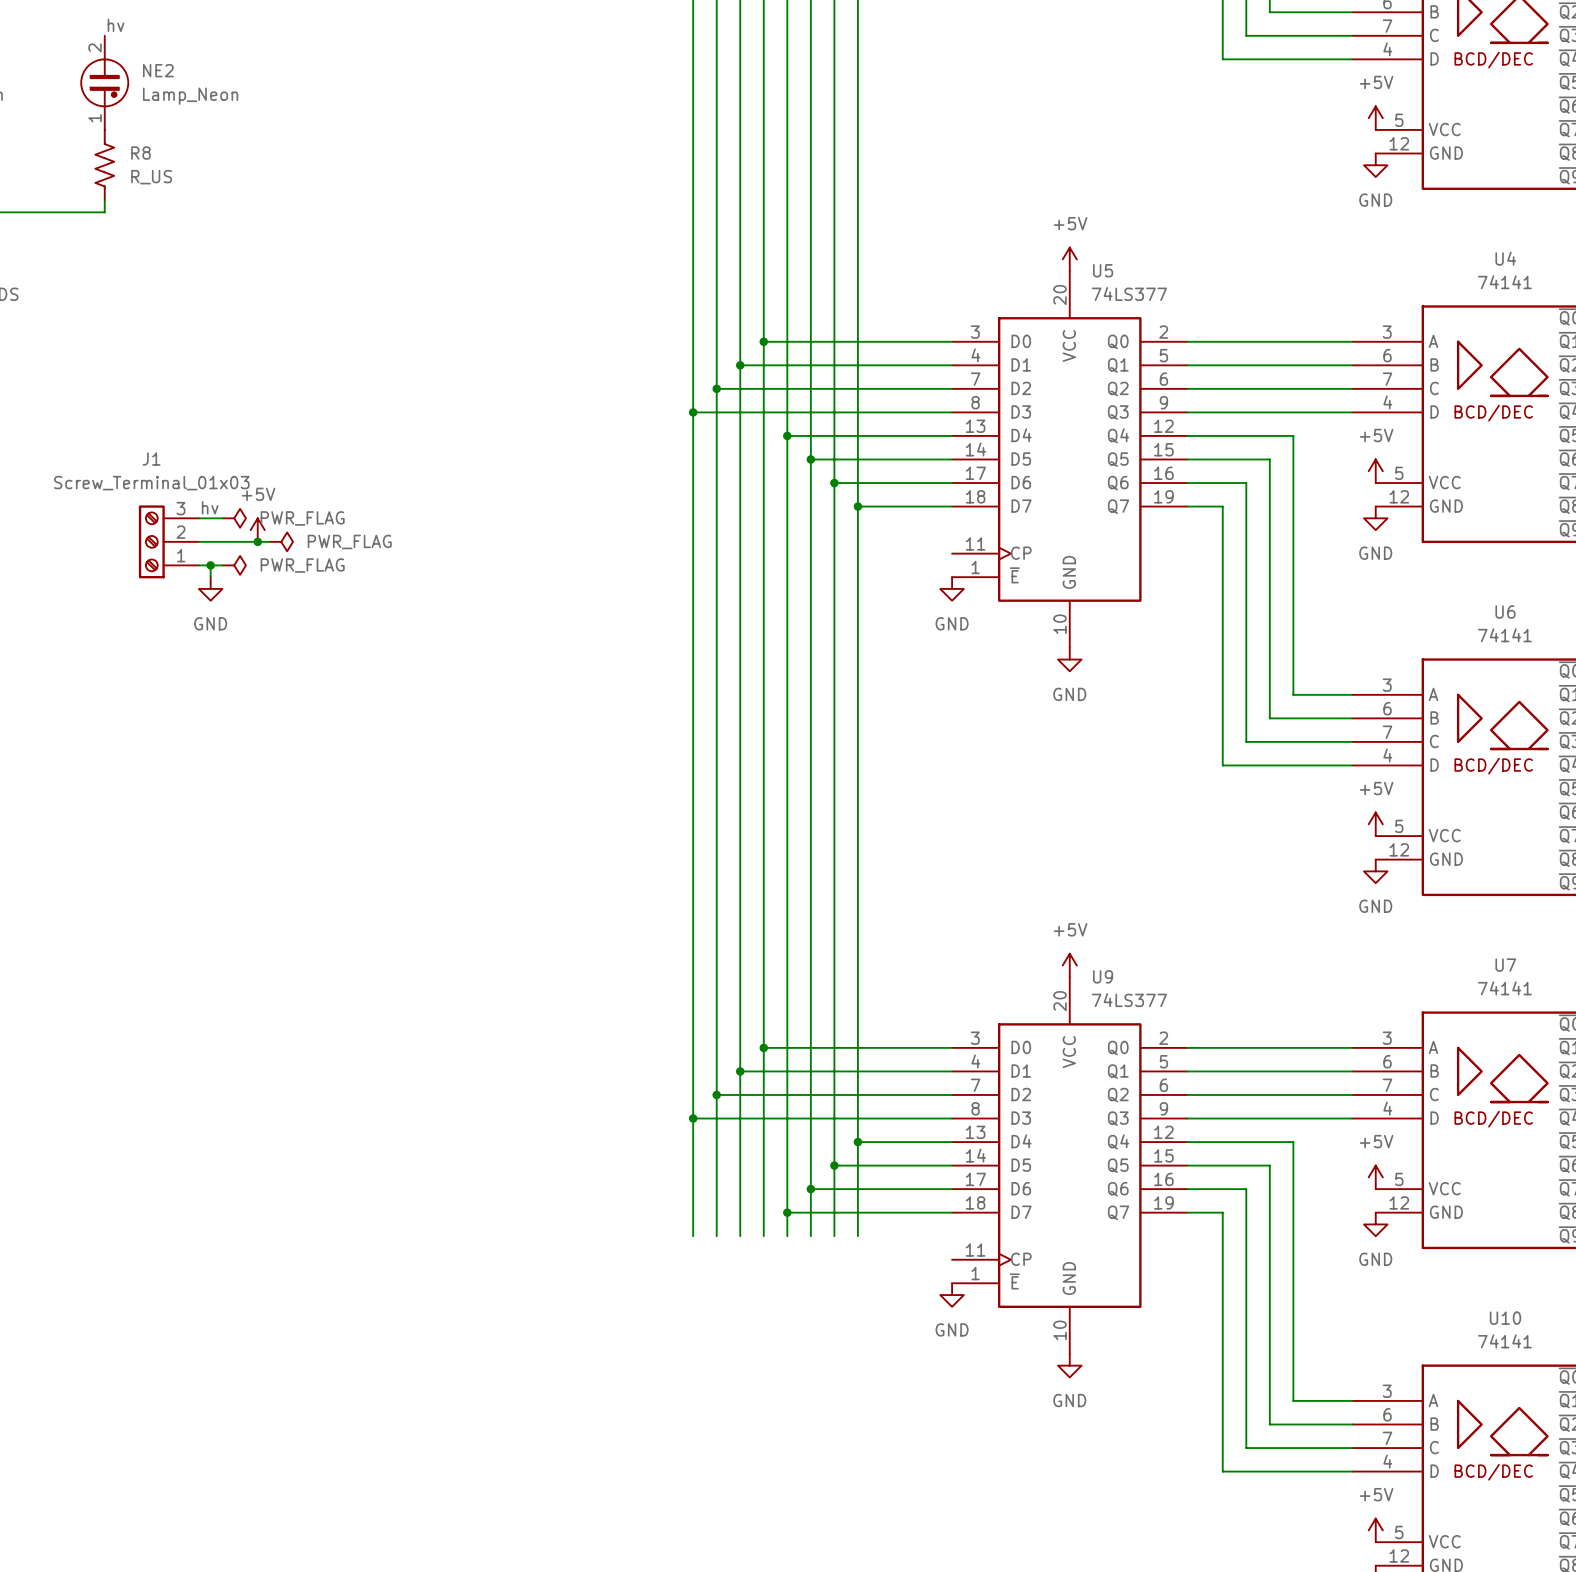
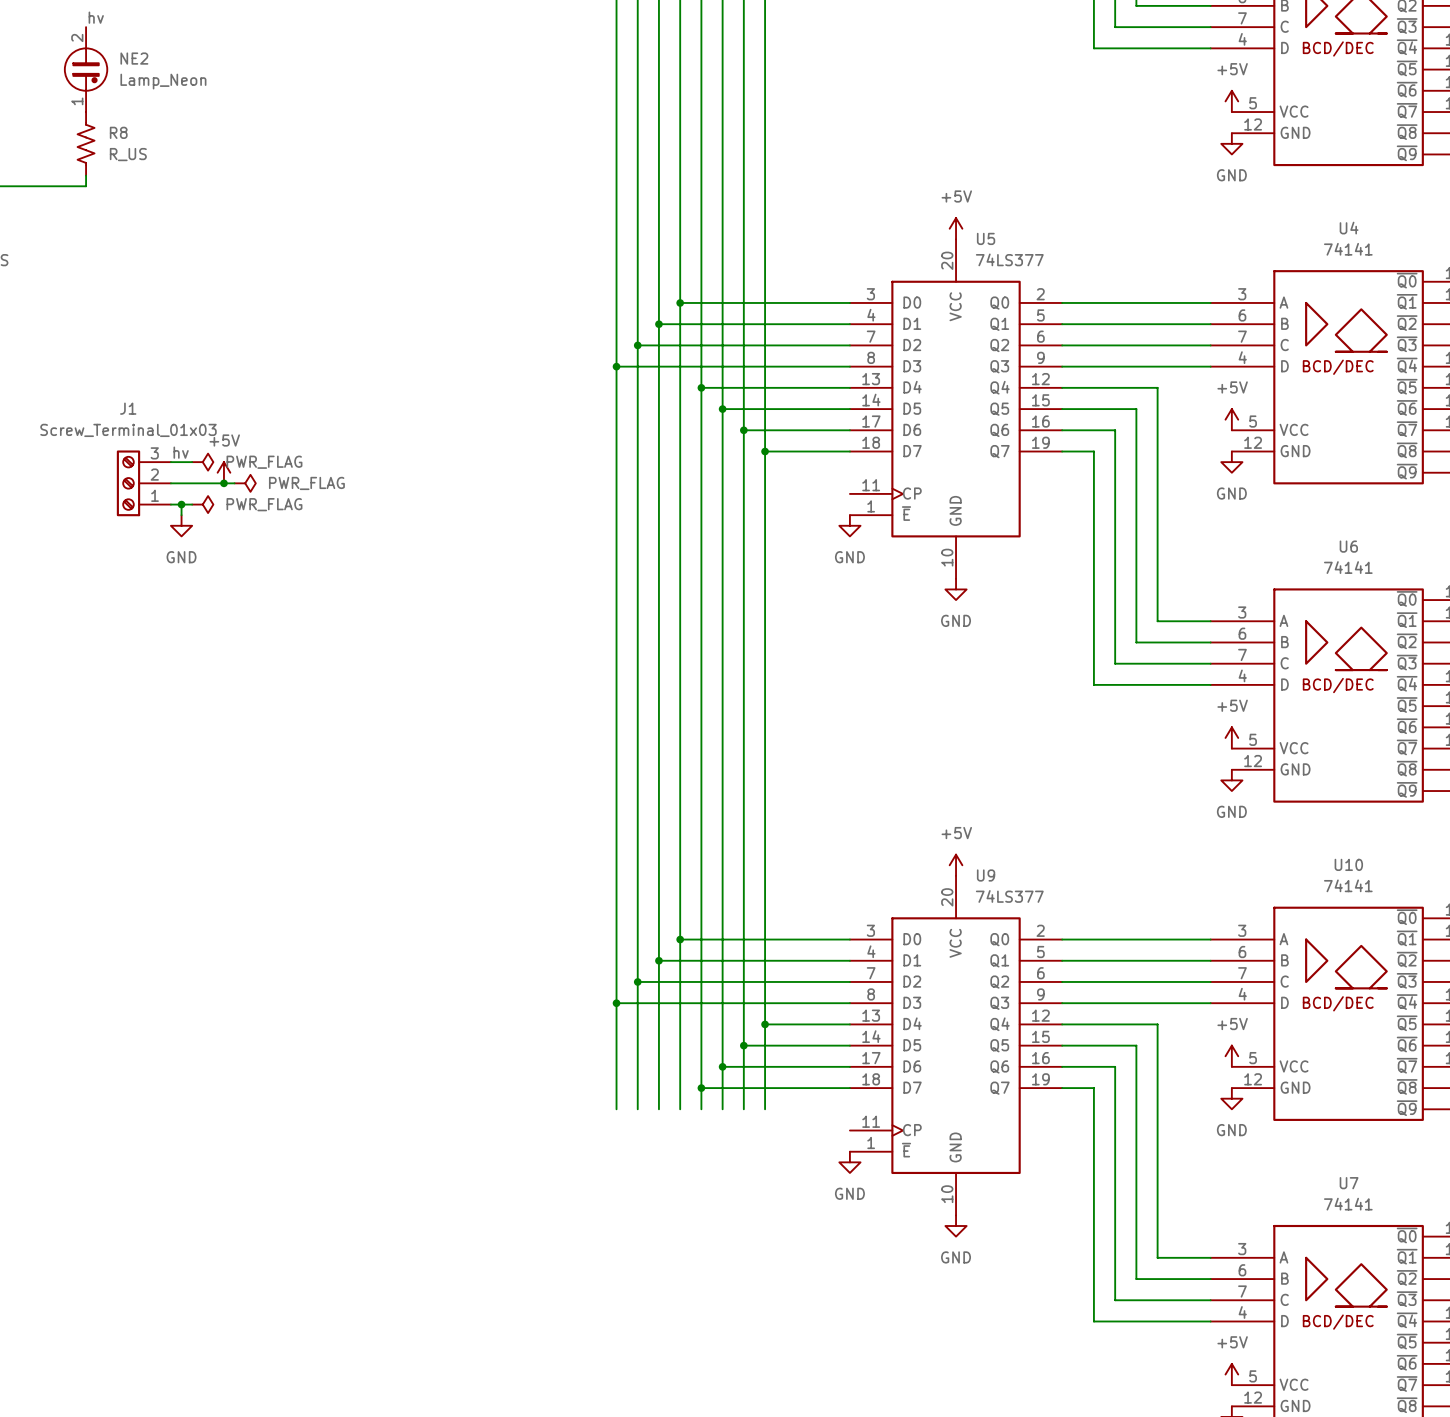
U7 name: U7 (1505, 965) -> U10 (1348, 864)
U10 name: U10 (1505, 1318) -> U7 (1349, 1183)

